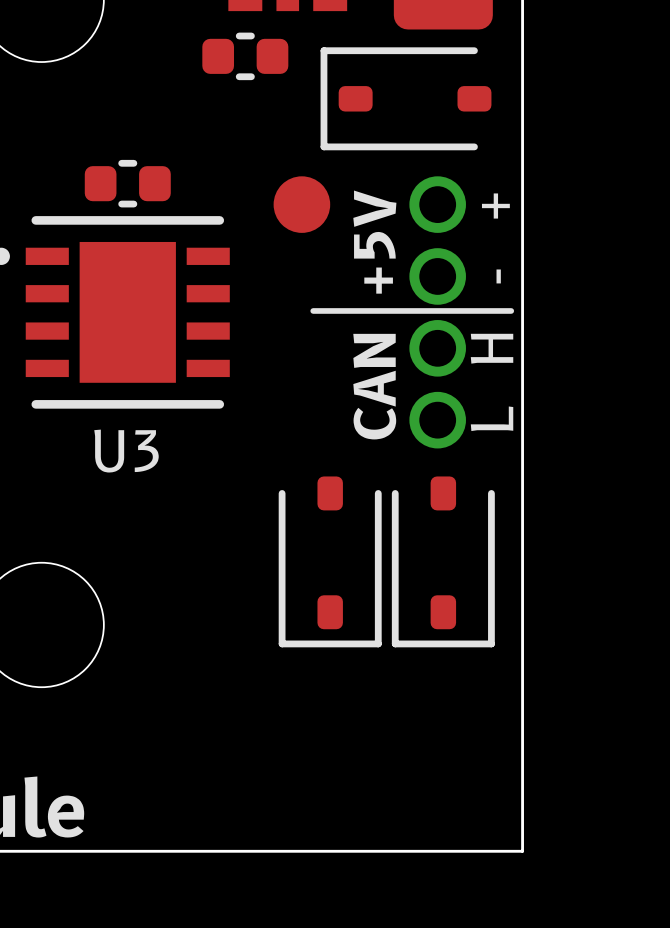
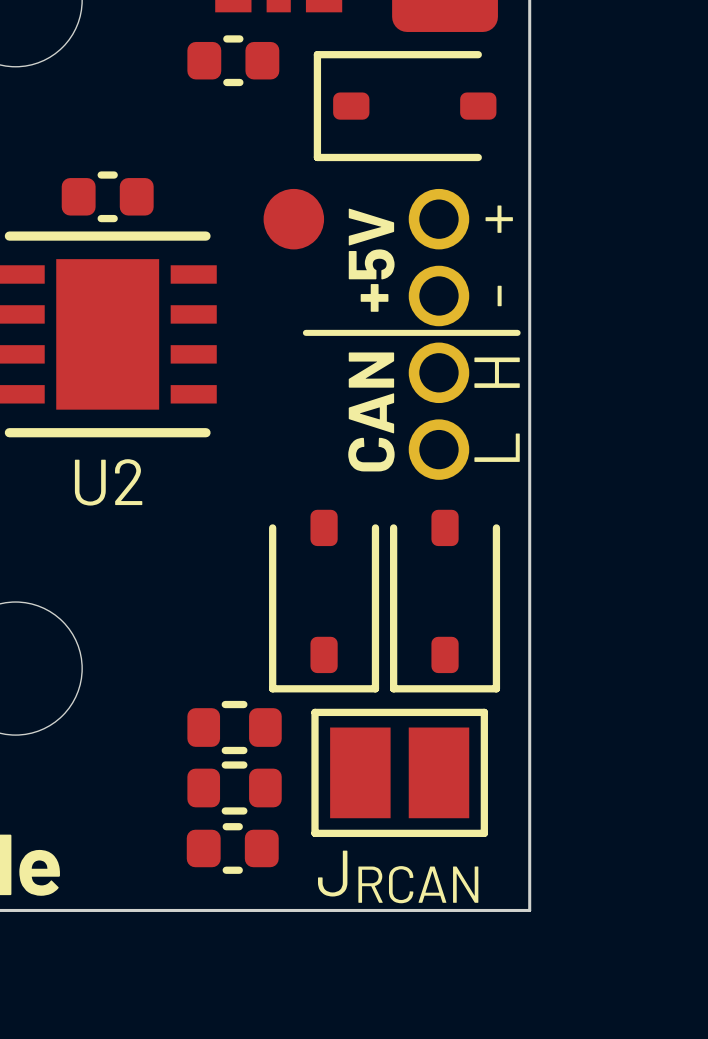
U3 name: U3 (126, 451) -> U2 (108, 482)
part: none -> (234, 727)
part: none -> (399, 772)
part: none -> (234, 787)
part: none -> (232, 848)
text: none -> JRCAN (398, 876)

